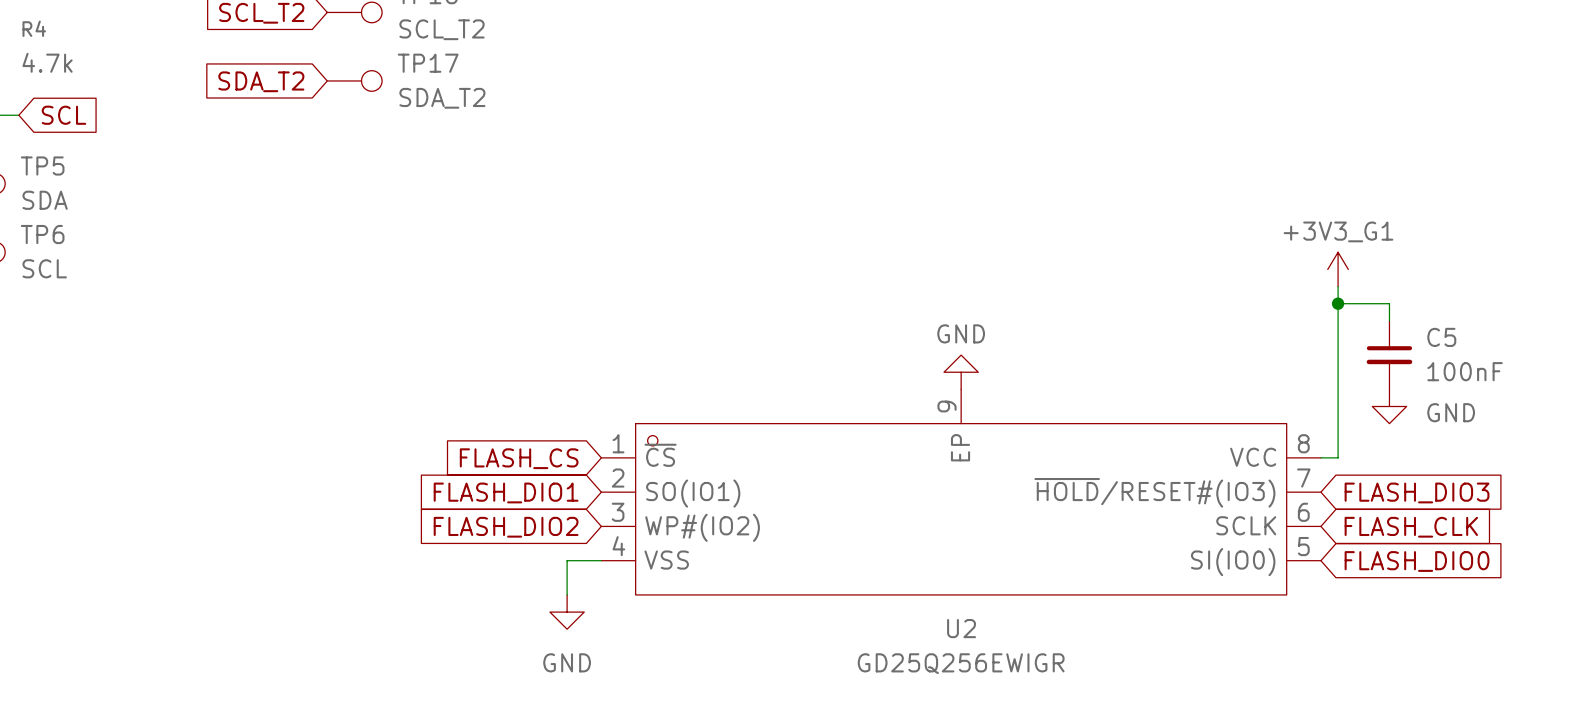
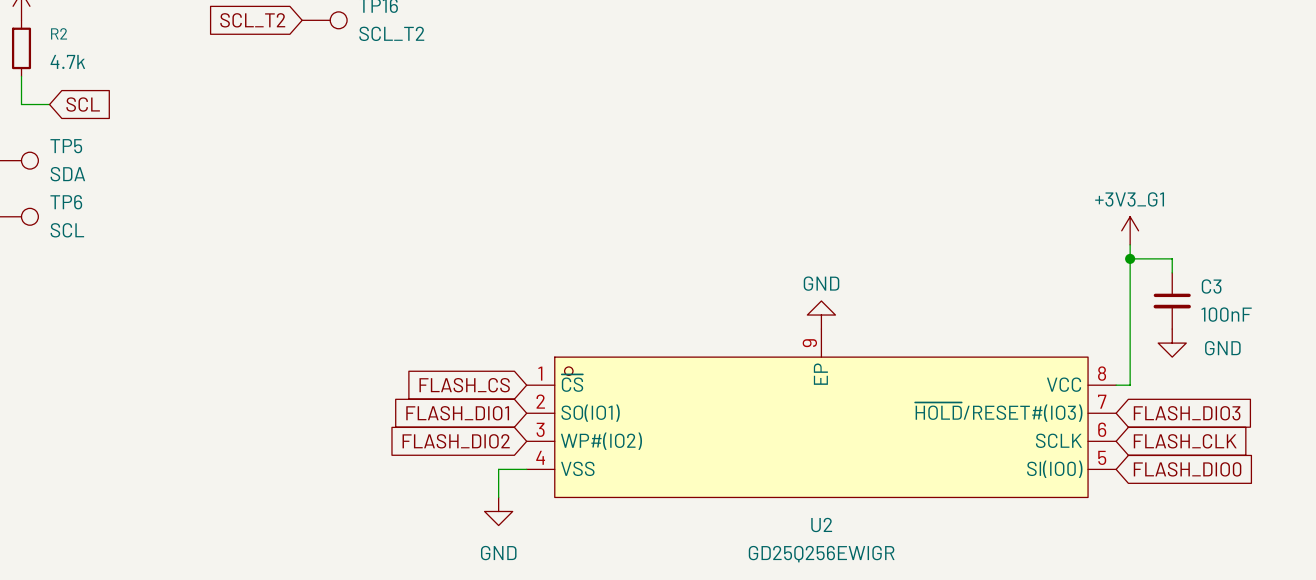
R4 name: R4 (34, 28) -> R2 (59, 33)
TP17: SDA_T2 (354, 80) -> none
global label: SDA_T2 (261, 81) -> none
C5 name: C5 (1441, 337) -> C3 (1211, 286)

